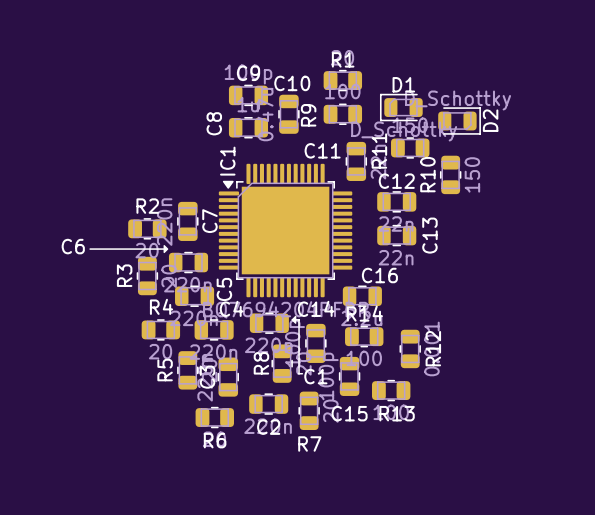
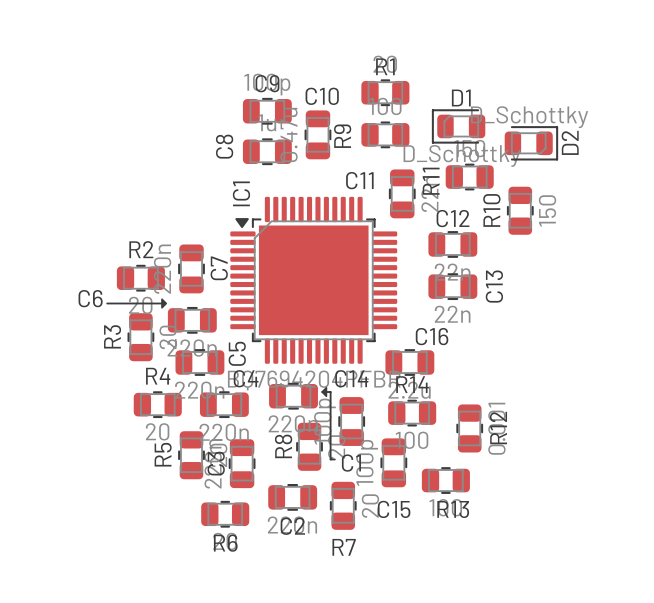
C6 name position: C6 (73, 246) -> C6 (90, 298)
line: (90, 249) (120, 249) -> none

